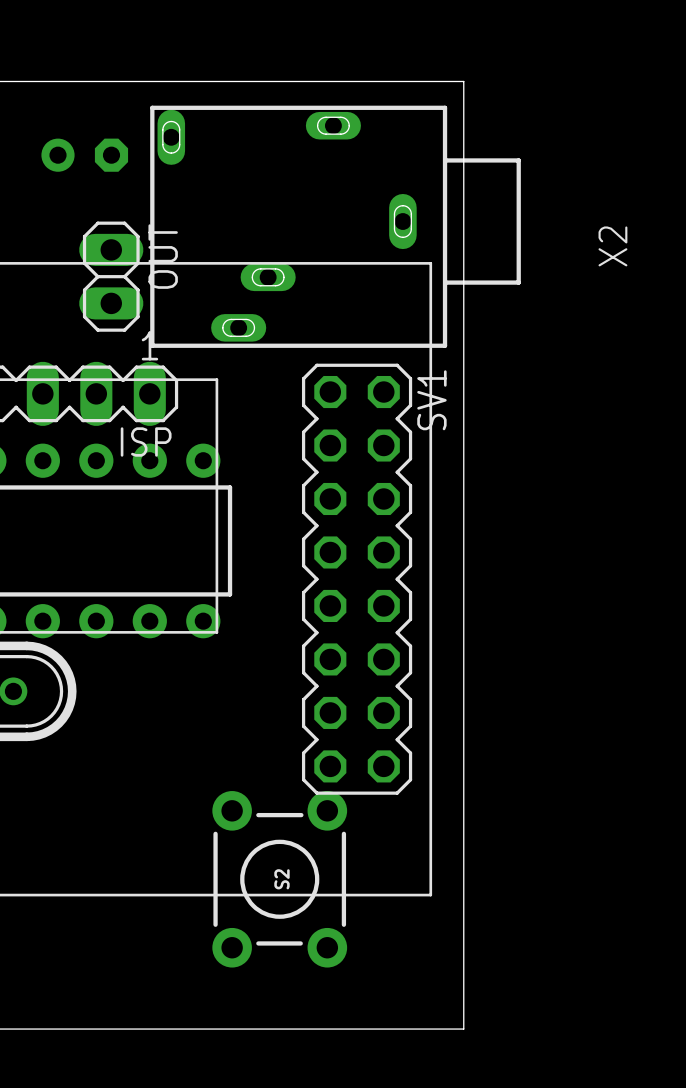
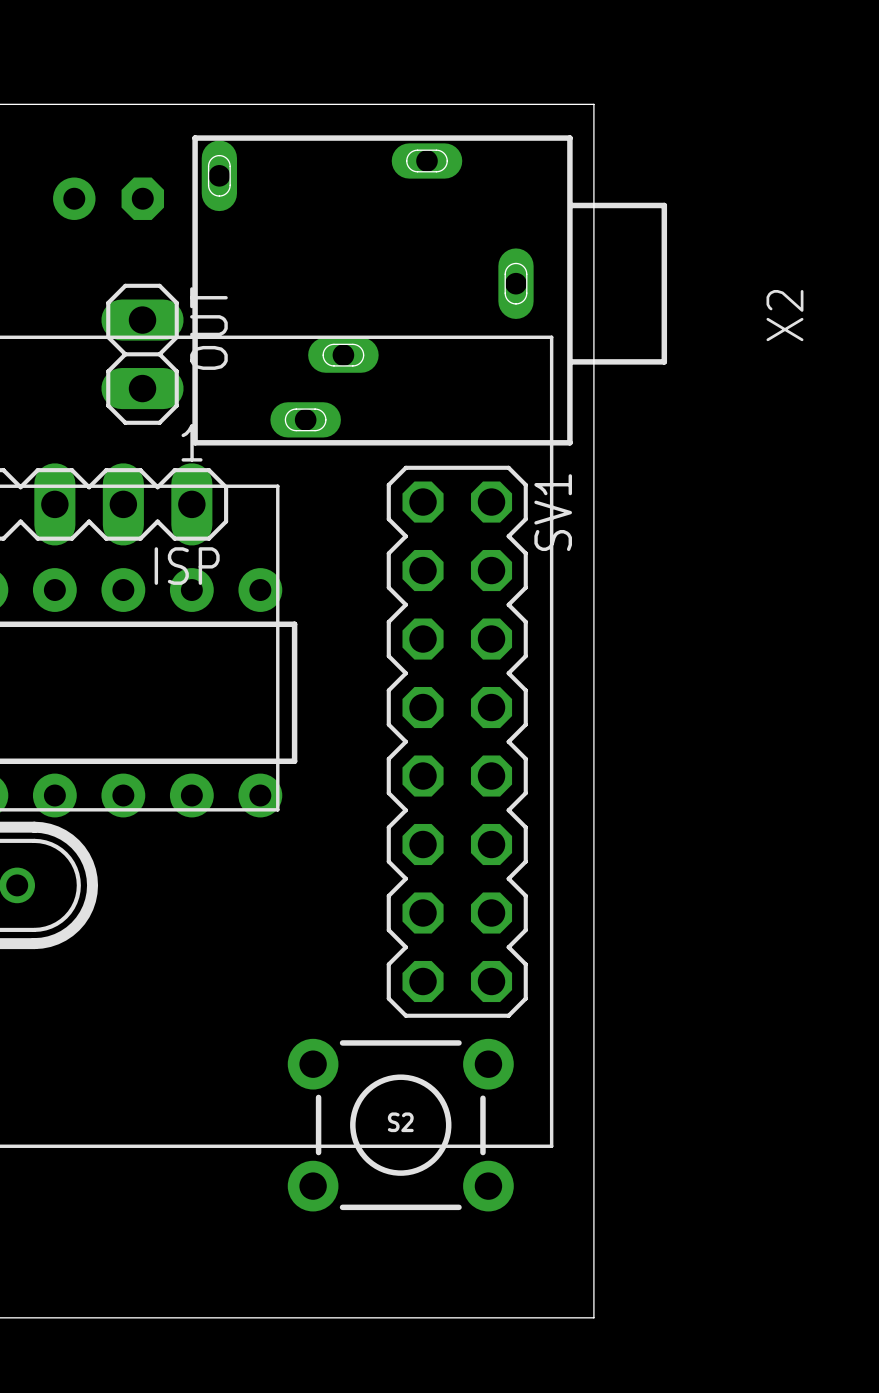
S2 rotation: 0° (279, 879) -> 90° clockwise (400, 1125)

